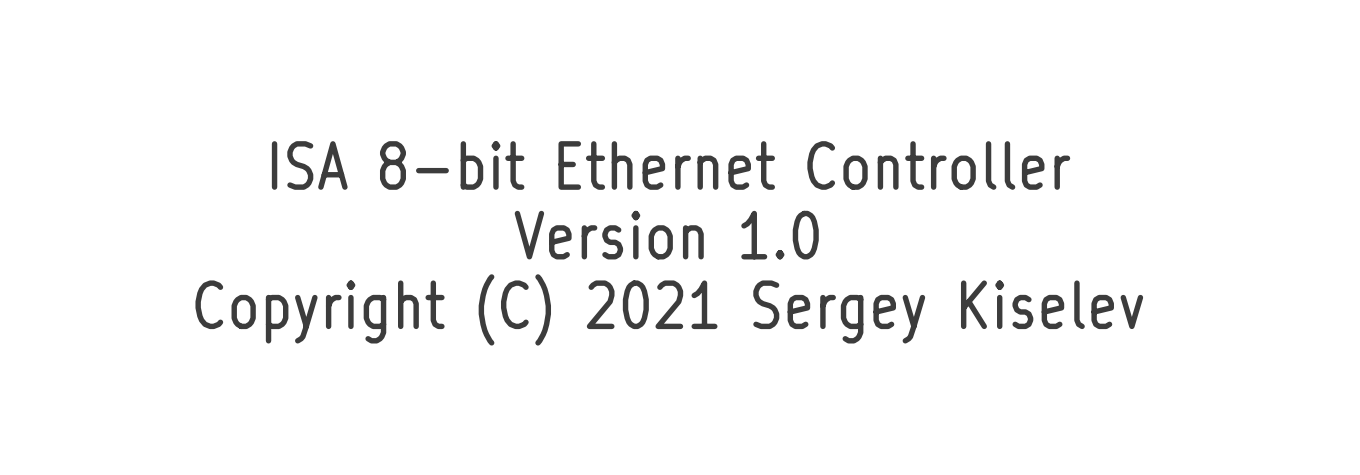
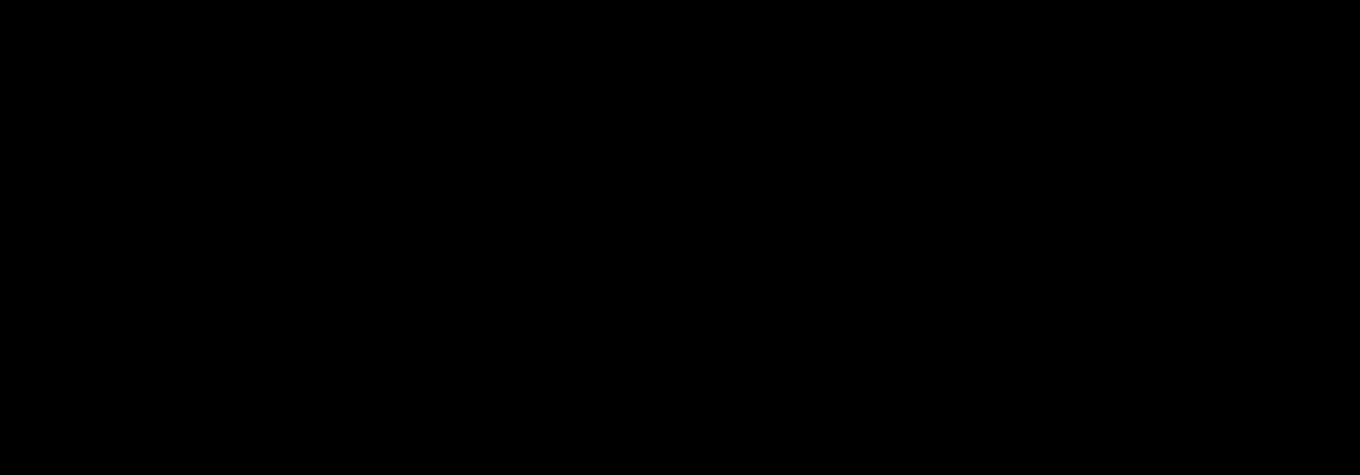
text: ISA 8-bit Ethernet Controller (671, 165) -> none
text: Version 1.0 (666, 235) -> none
text: Copyright (C) 2021 Sergey Kiselev (669, 309) -> none

